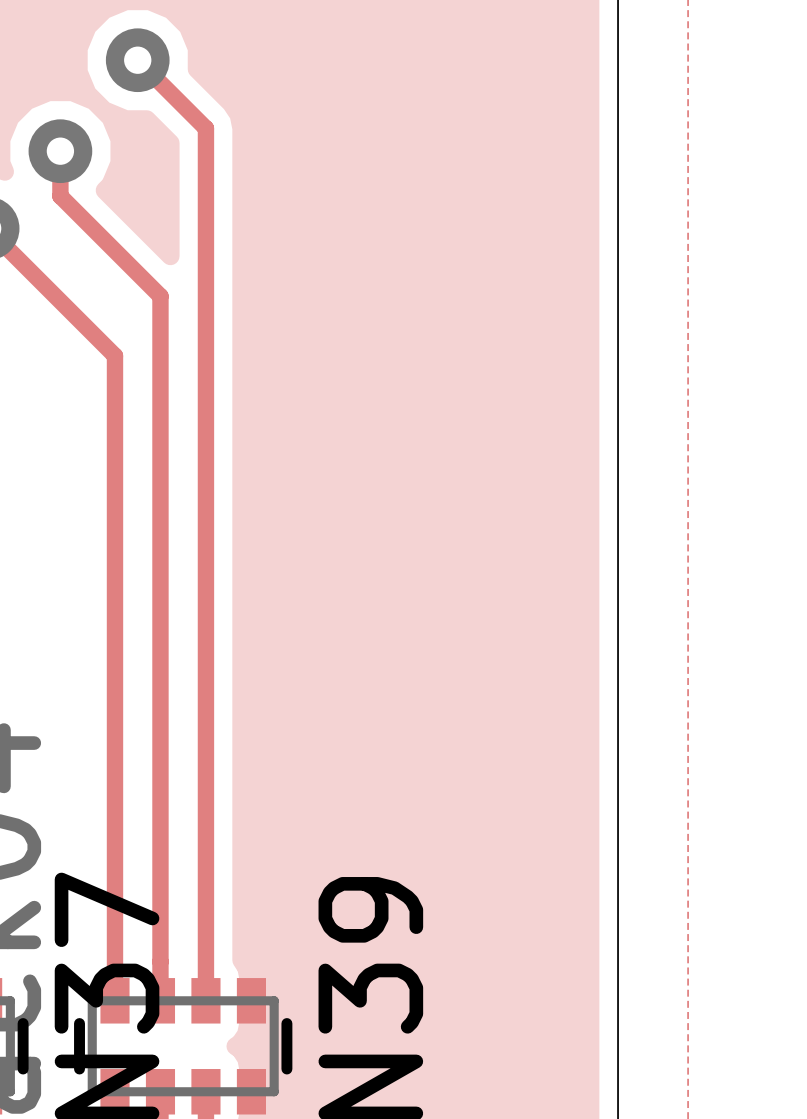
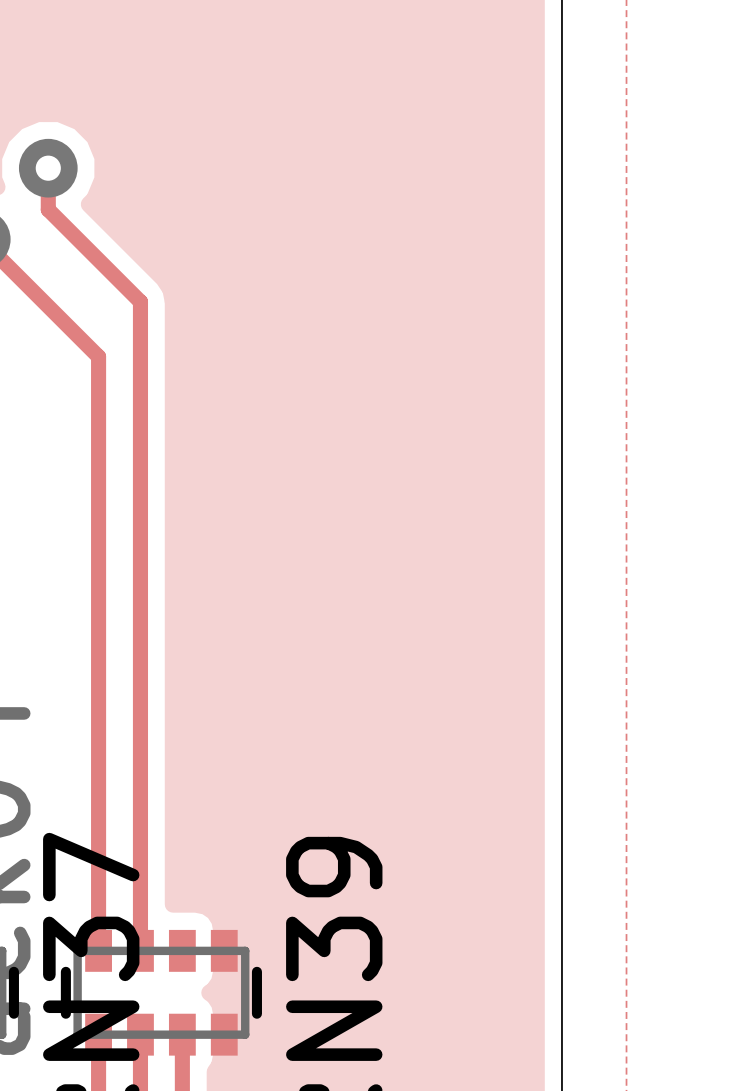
track: (137, 60) (205, 128) (205, 1000) -> none
via: (137, 60) -> none

